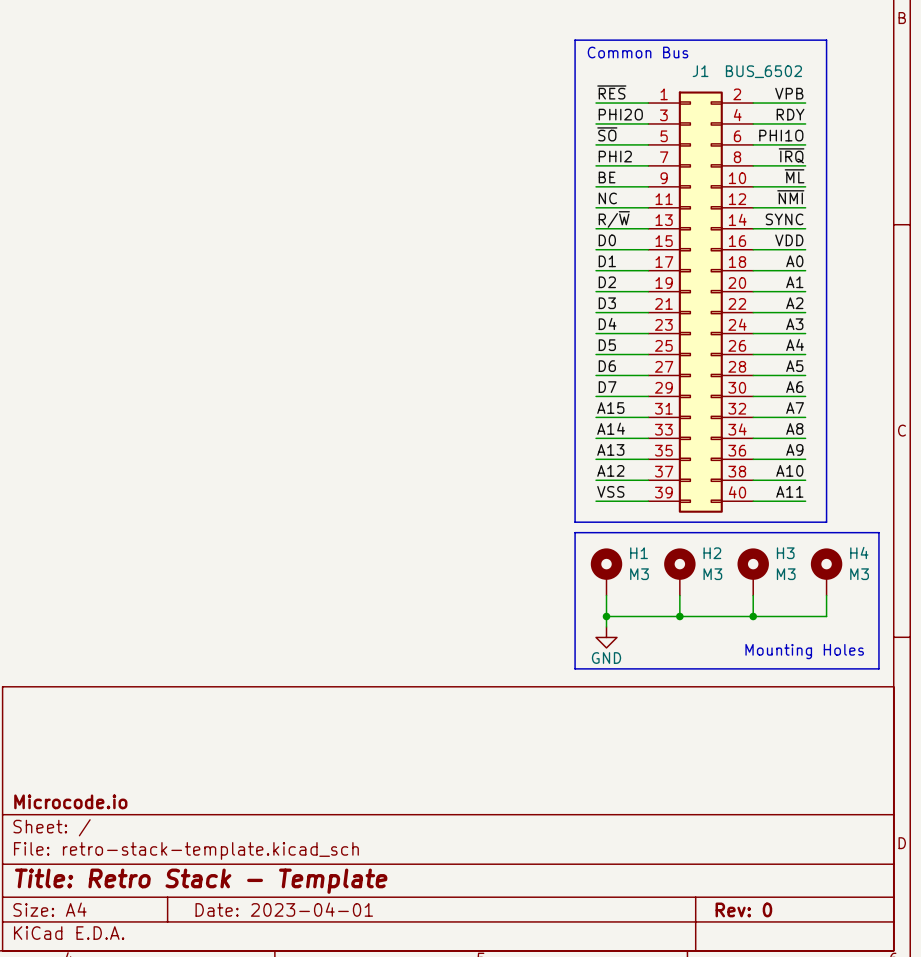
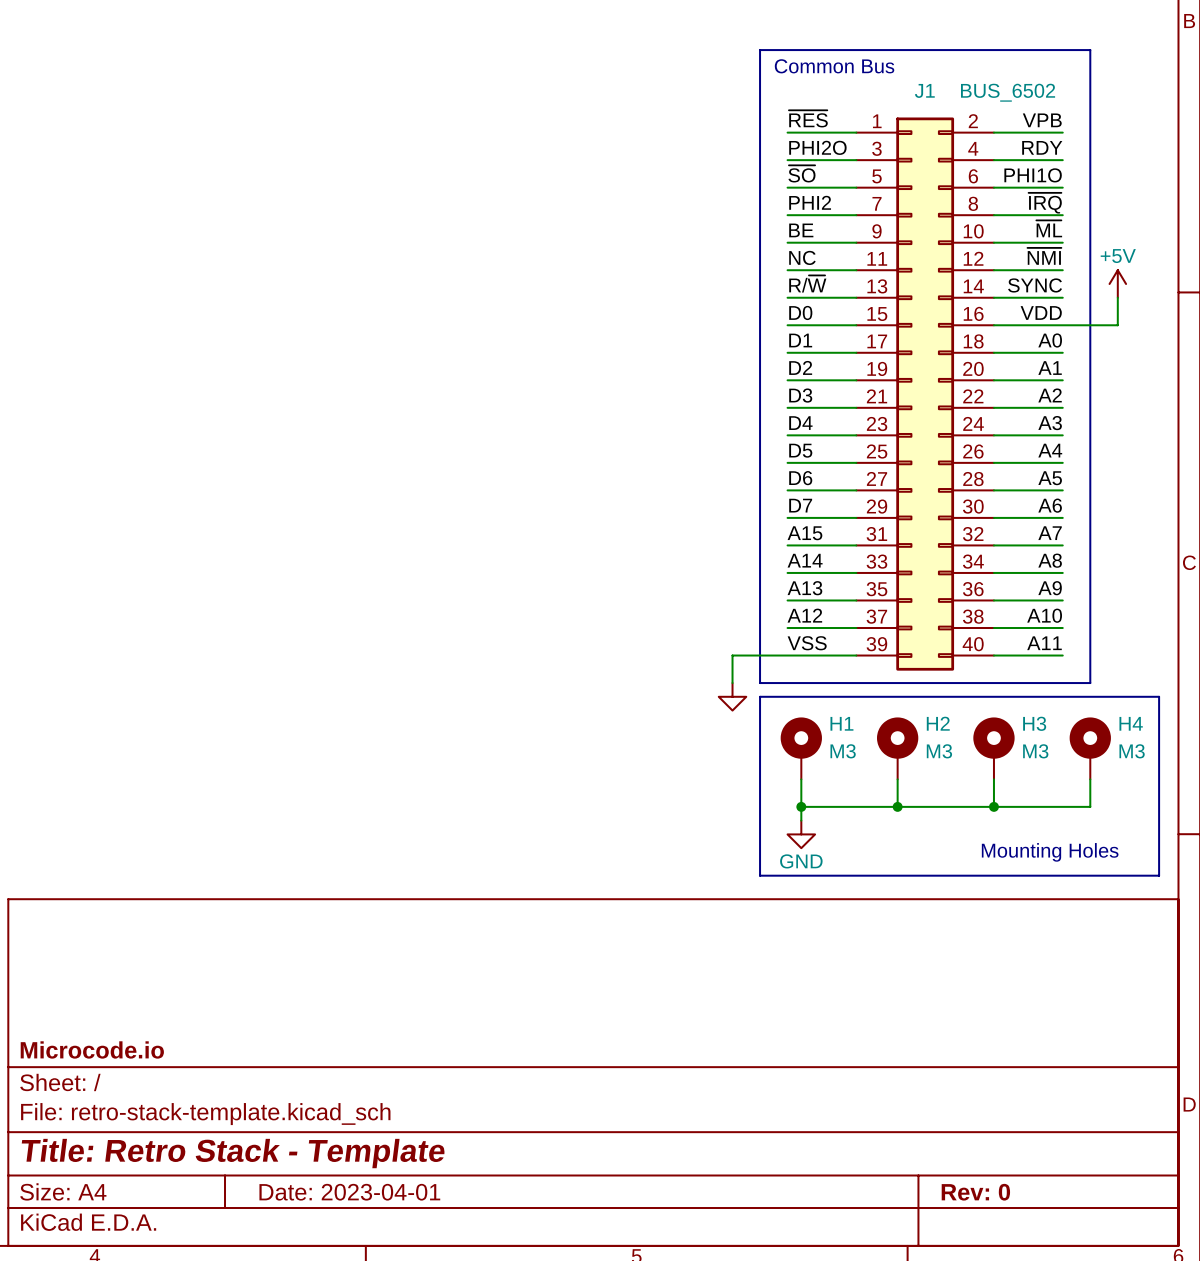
power symbol: none -> +5V (1117, 283)
wire: none -> (1117, 297) (1117, 325) (1062, 325)
wire: none -> (787, 655) (732, 655) (732, 683)
power symbol: none -> (732, 696)

